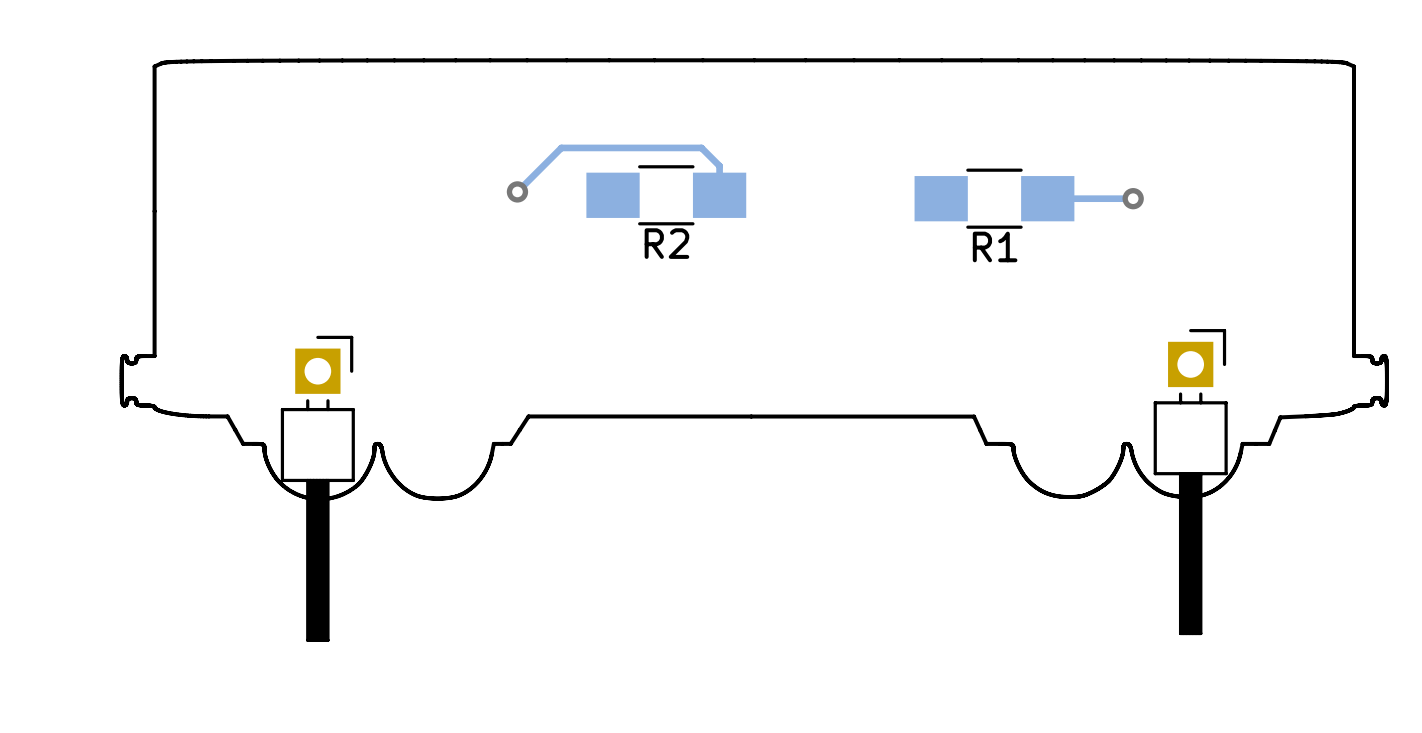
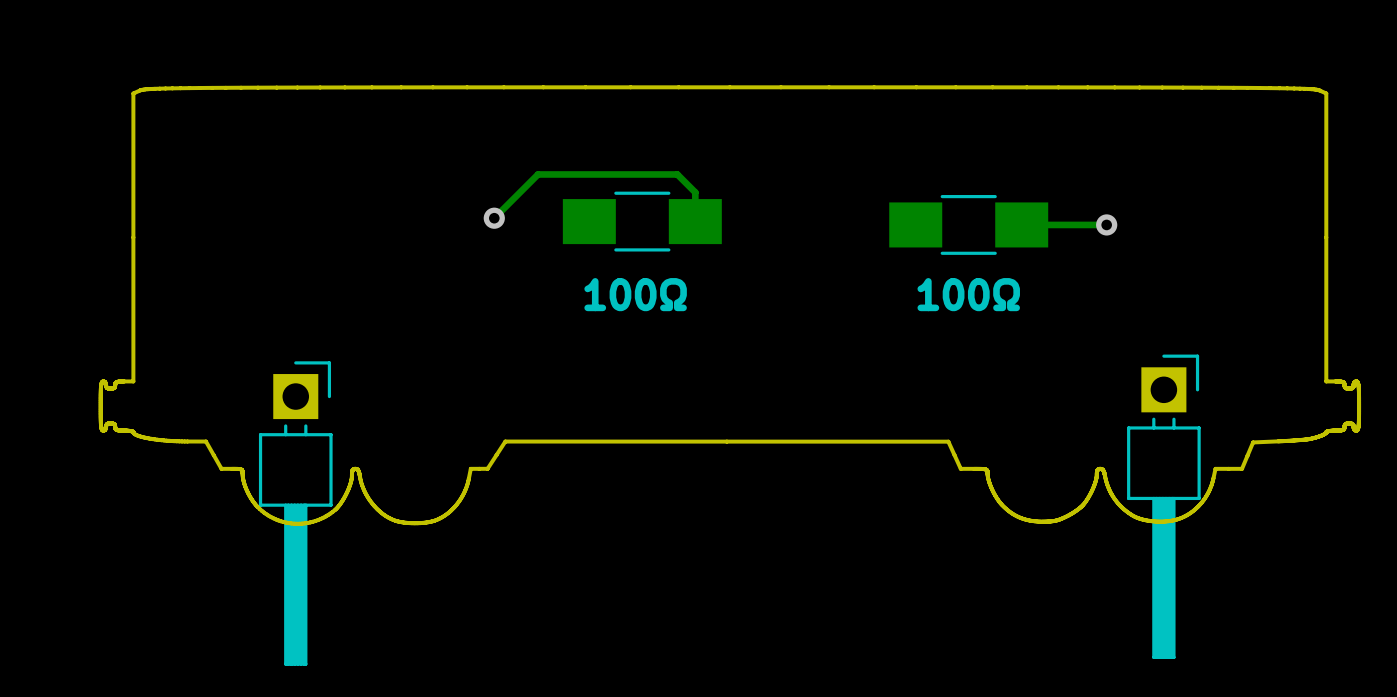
R2 name: R2 (666, 243) -> none
R1 name: R1 (995, 246) -> none
text: none -> 100Ω (635, 294)
text: none -> 100Ω (968, 294)

